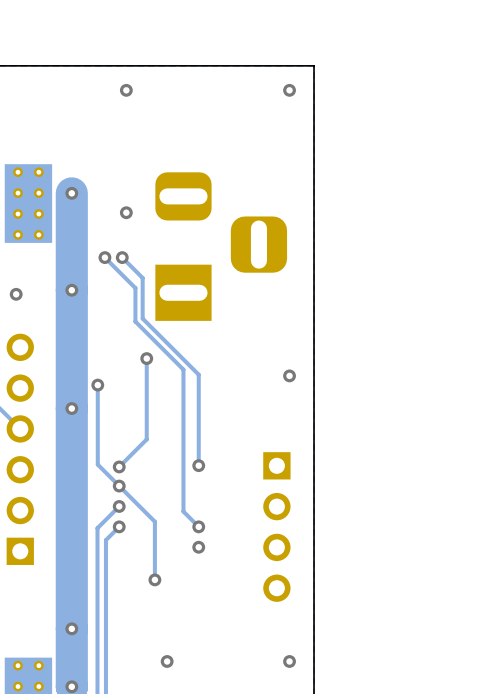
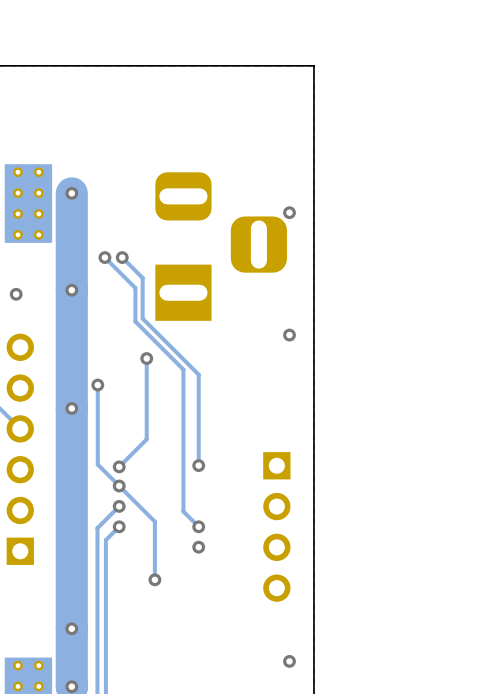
via: (126, 90) -> none
via: (289, 90) -> none
via: (126, 212) -> none
via: none -> (289, 212)
via position: (289, 375) -> (289, 335)
via: (167, 661) -> none

